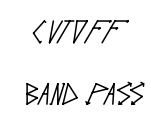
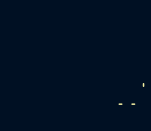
line: (53, 21) (49, 42) (62, 21) -> none
line: (64, 21) (73, 21) -> none
line: (69, 21) (57, 42) -> none
line: (77, 21) (73, 42) (87, 21) (77, 21) -> none
line: (45, 22) (44, 21) (33, 33) (39, 42) (41, 41) -> none
line: (109, 22) (110, 21) (97, 21) (84, 42) -> none
line: (127, 22) (128, 21) (114, 21) (102, 42) -> none
line: (93, 28) (100, 28) (98, 29) -> none
line: (110, 28) (117, 28) (116, 29) -> none
line: (128, 82) (130, 83) -> none
line: (140, 82) (143, 83) (130, 90) (142, 96) (132, 104) (132, 101) -> none
line: (27, 83) (27, 104) (37, 97) (27, 93) (37, 88) (27, 83) -> none
line: (62, 83) (57, 104) (57, 83) (50, 104) -> none
line: (68, 83) (77, 97) (62, 104) (68, 83) -> none
line: (130, 83) (117, 90) (129, 96) (119, 104) (119, 101) -> none
line: (130, 83) (130, 86) -> none
line: (92, 92) (107, 88) (96, 83) (87, 104) -> none
line: (43, 93) (46, 93) -> none
line: (108, 93) (112, 93) -> none
line: (85, 101) (87, 104) -> none
line: (89, 102) (87, 104) -> none
line: (37, 104) (48, 83) (46, 104) -> none
line: (103, 104) (114, 83) (112, 104) -> none

